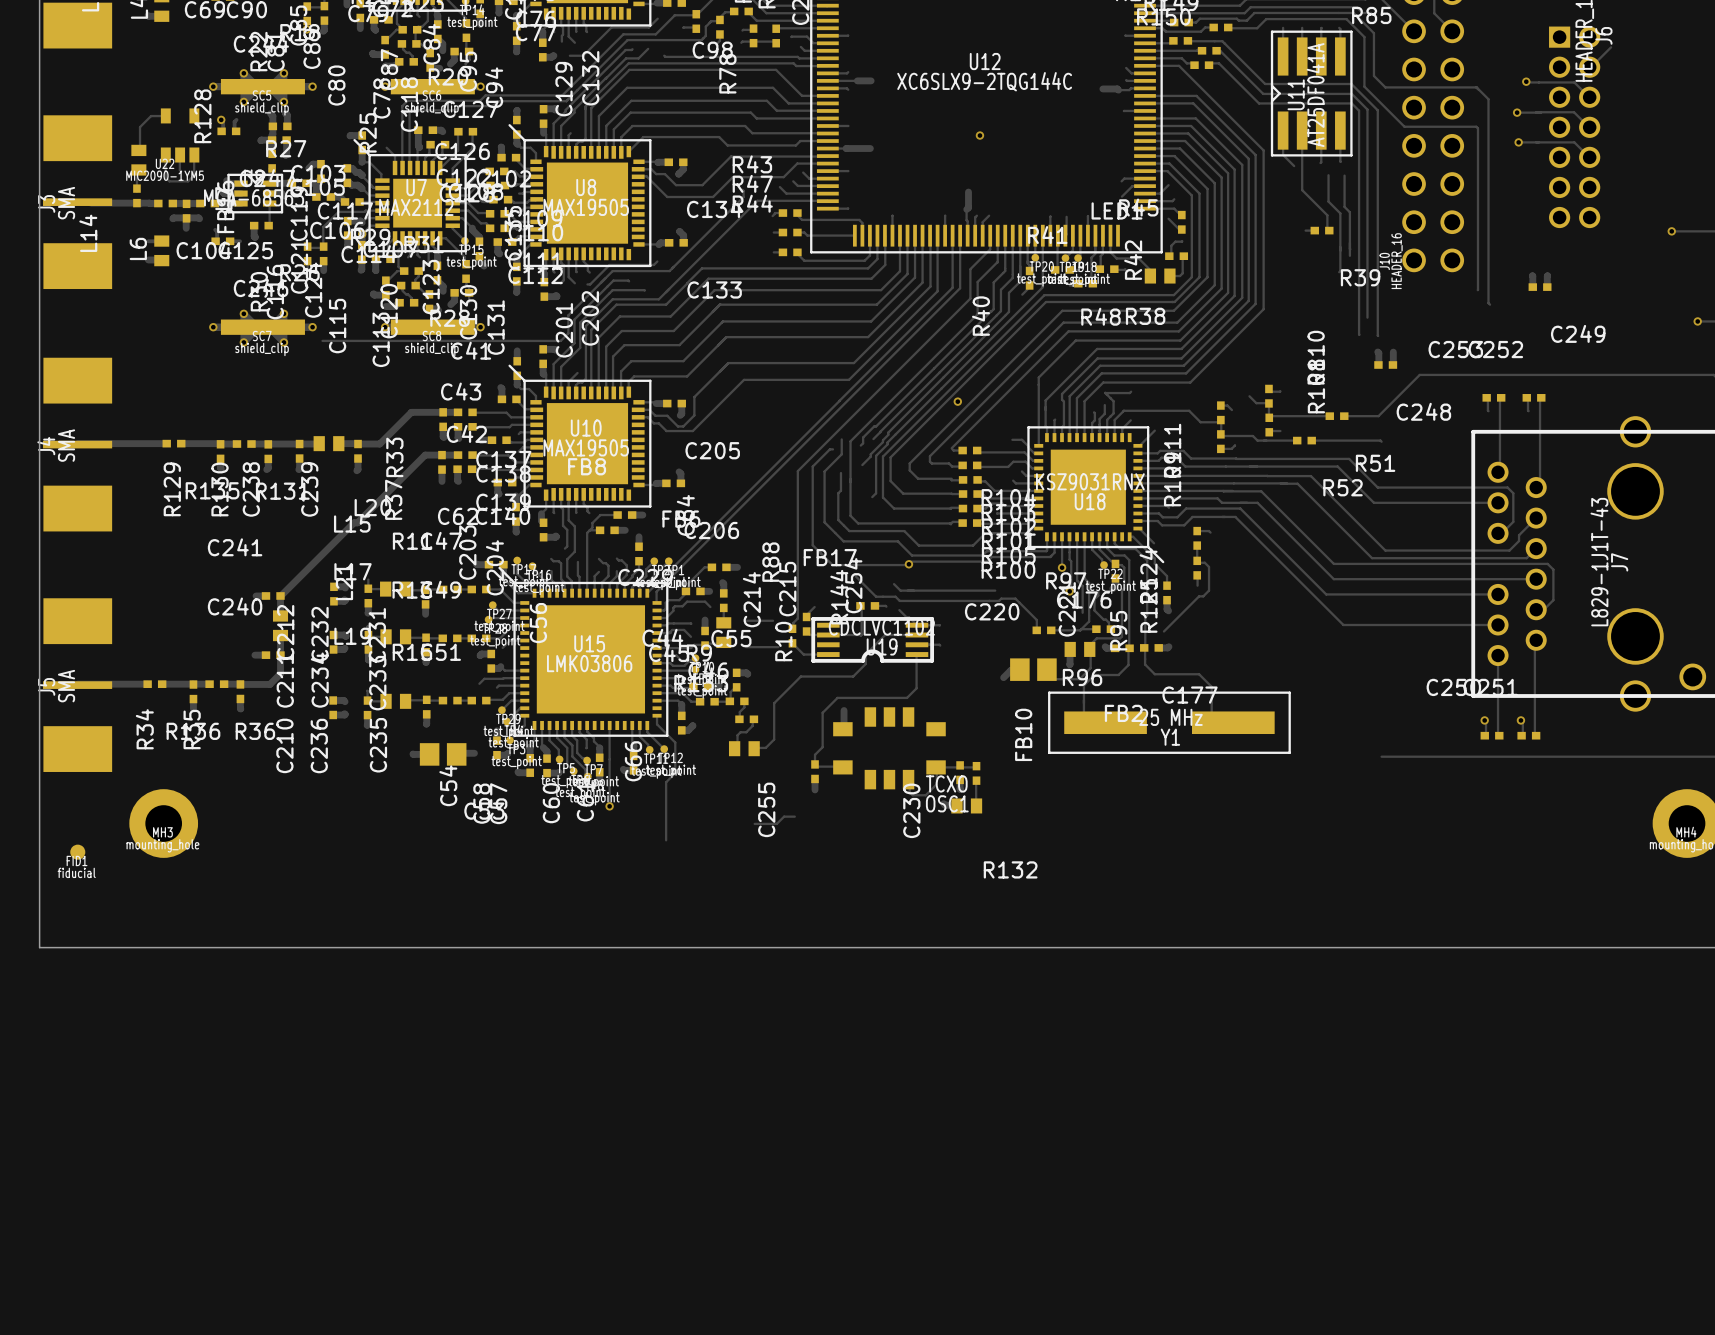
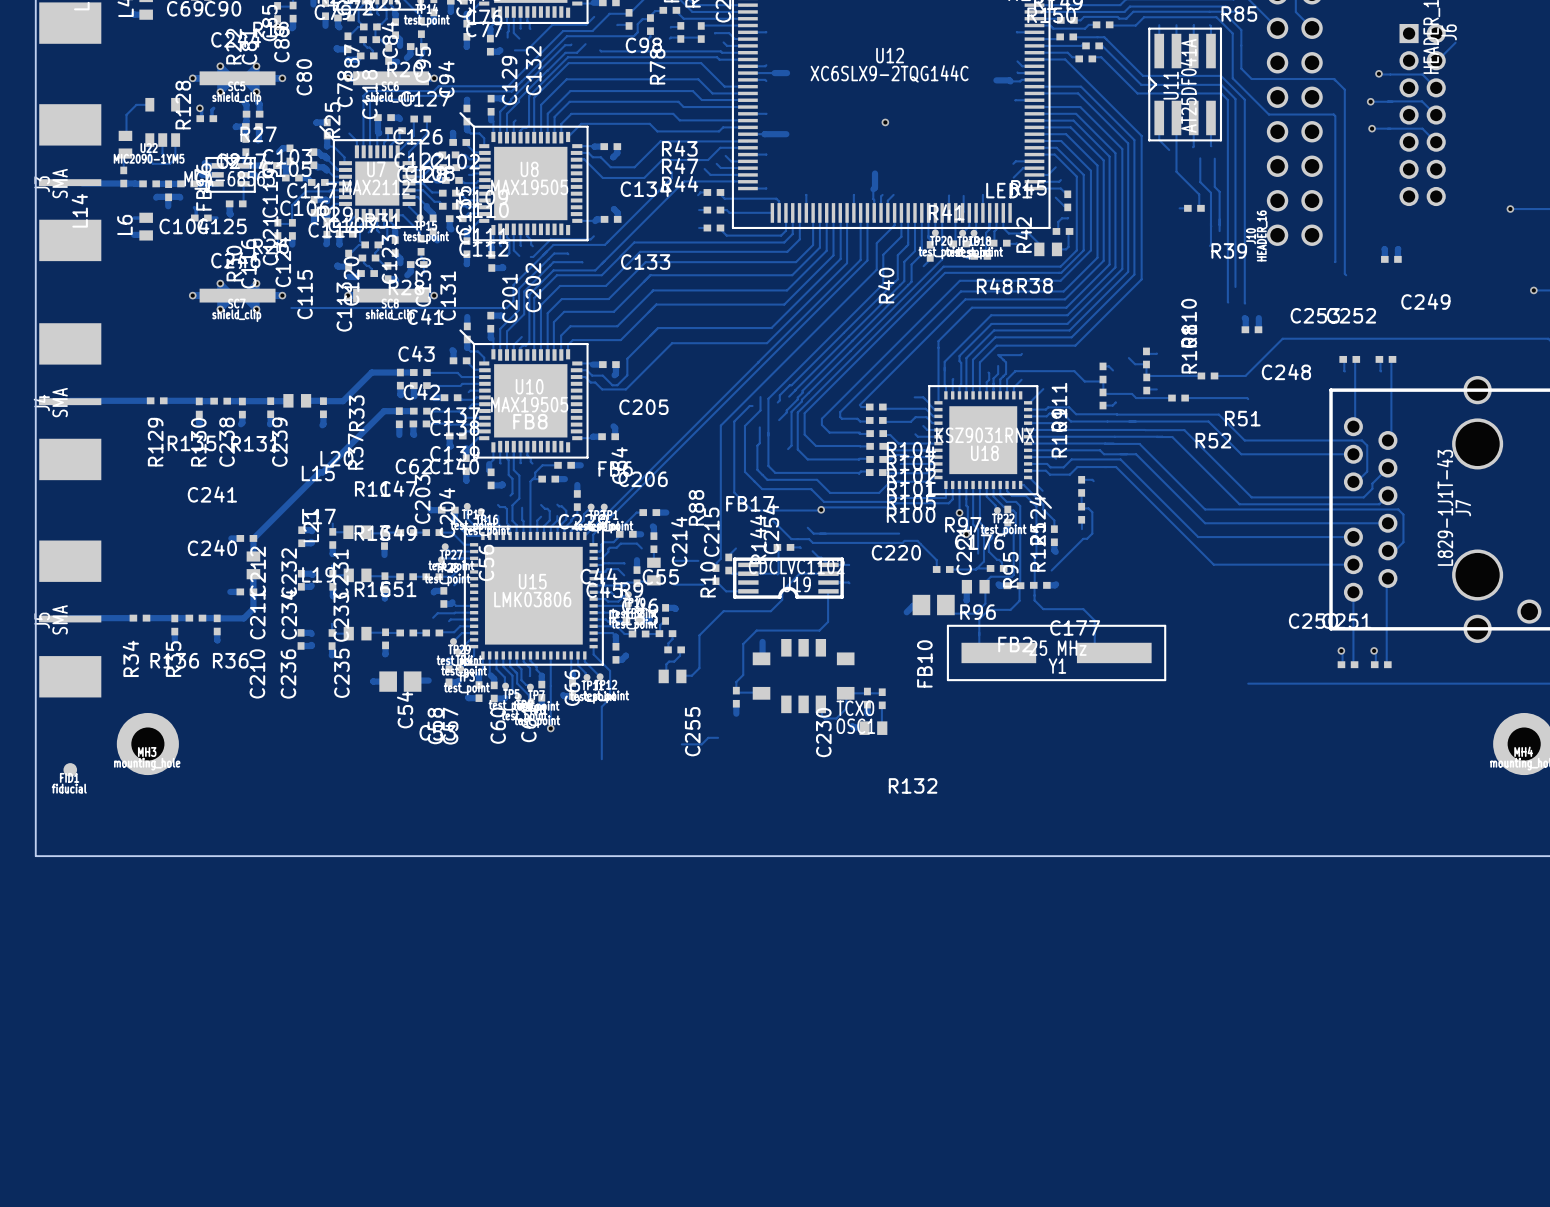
via: (957, 401) -> none

